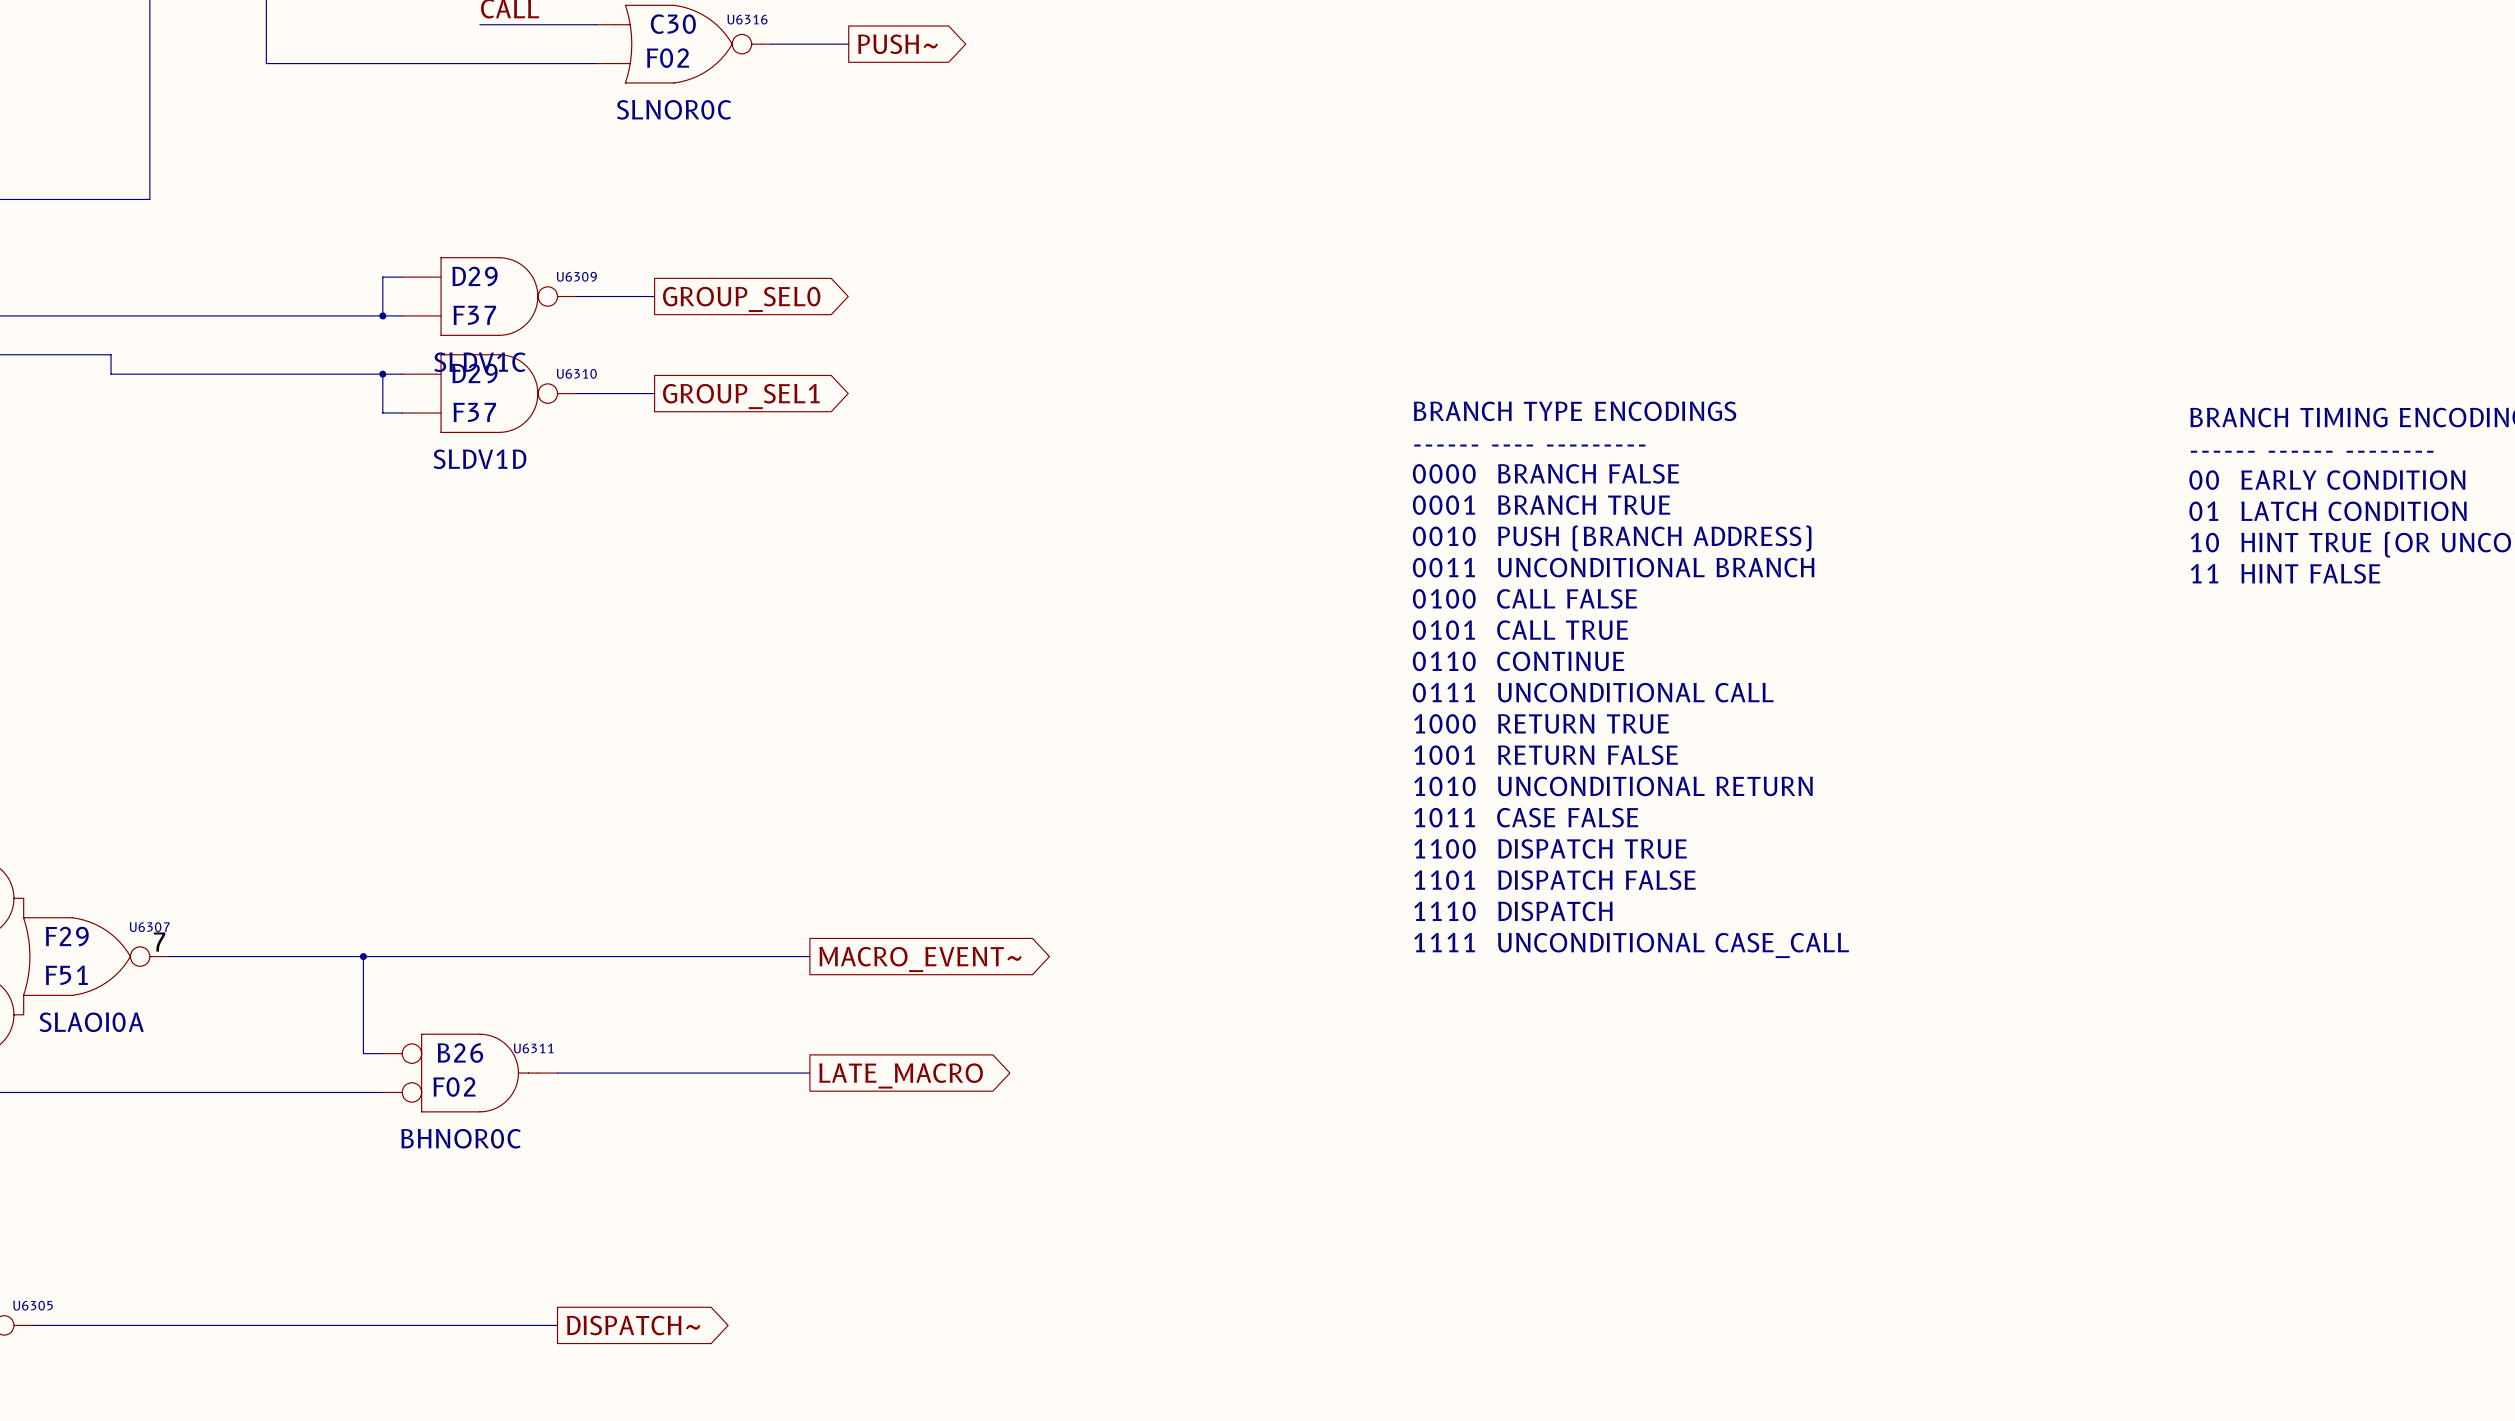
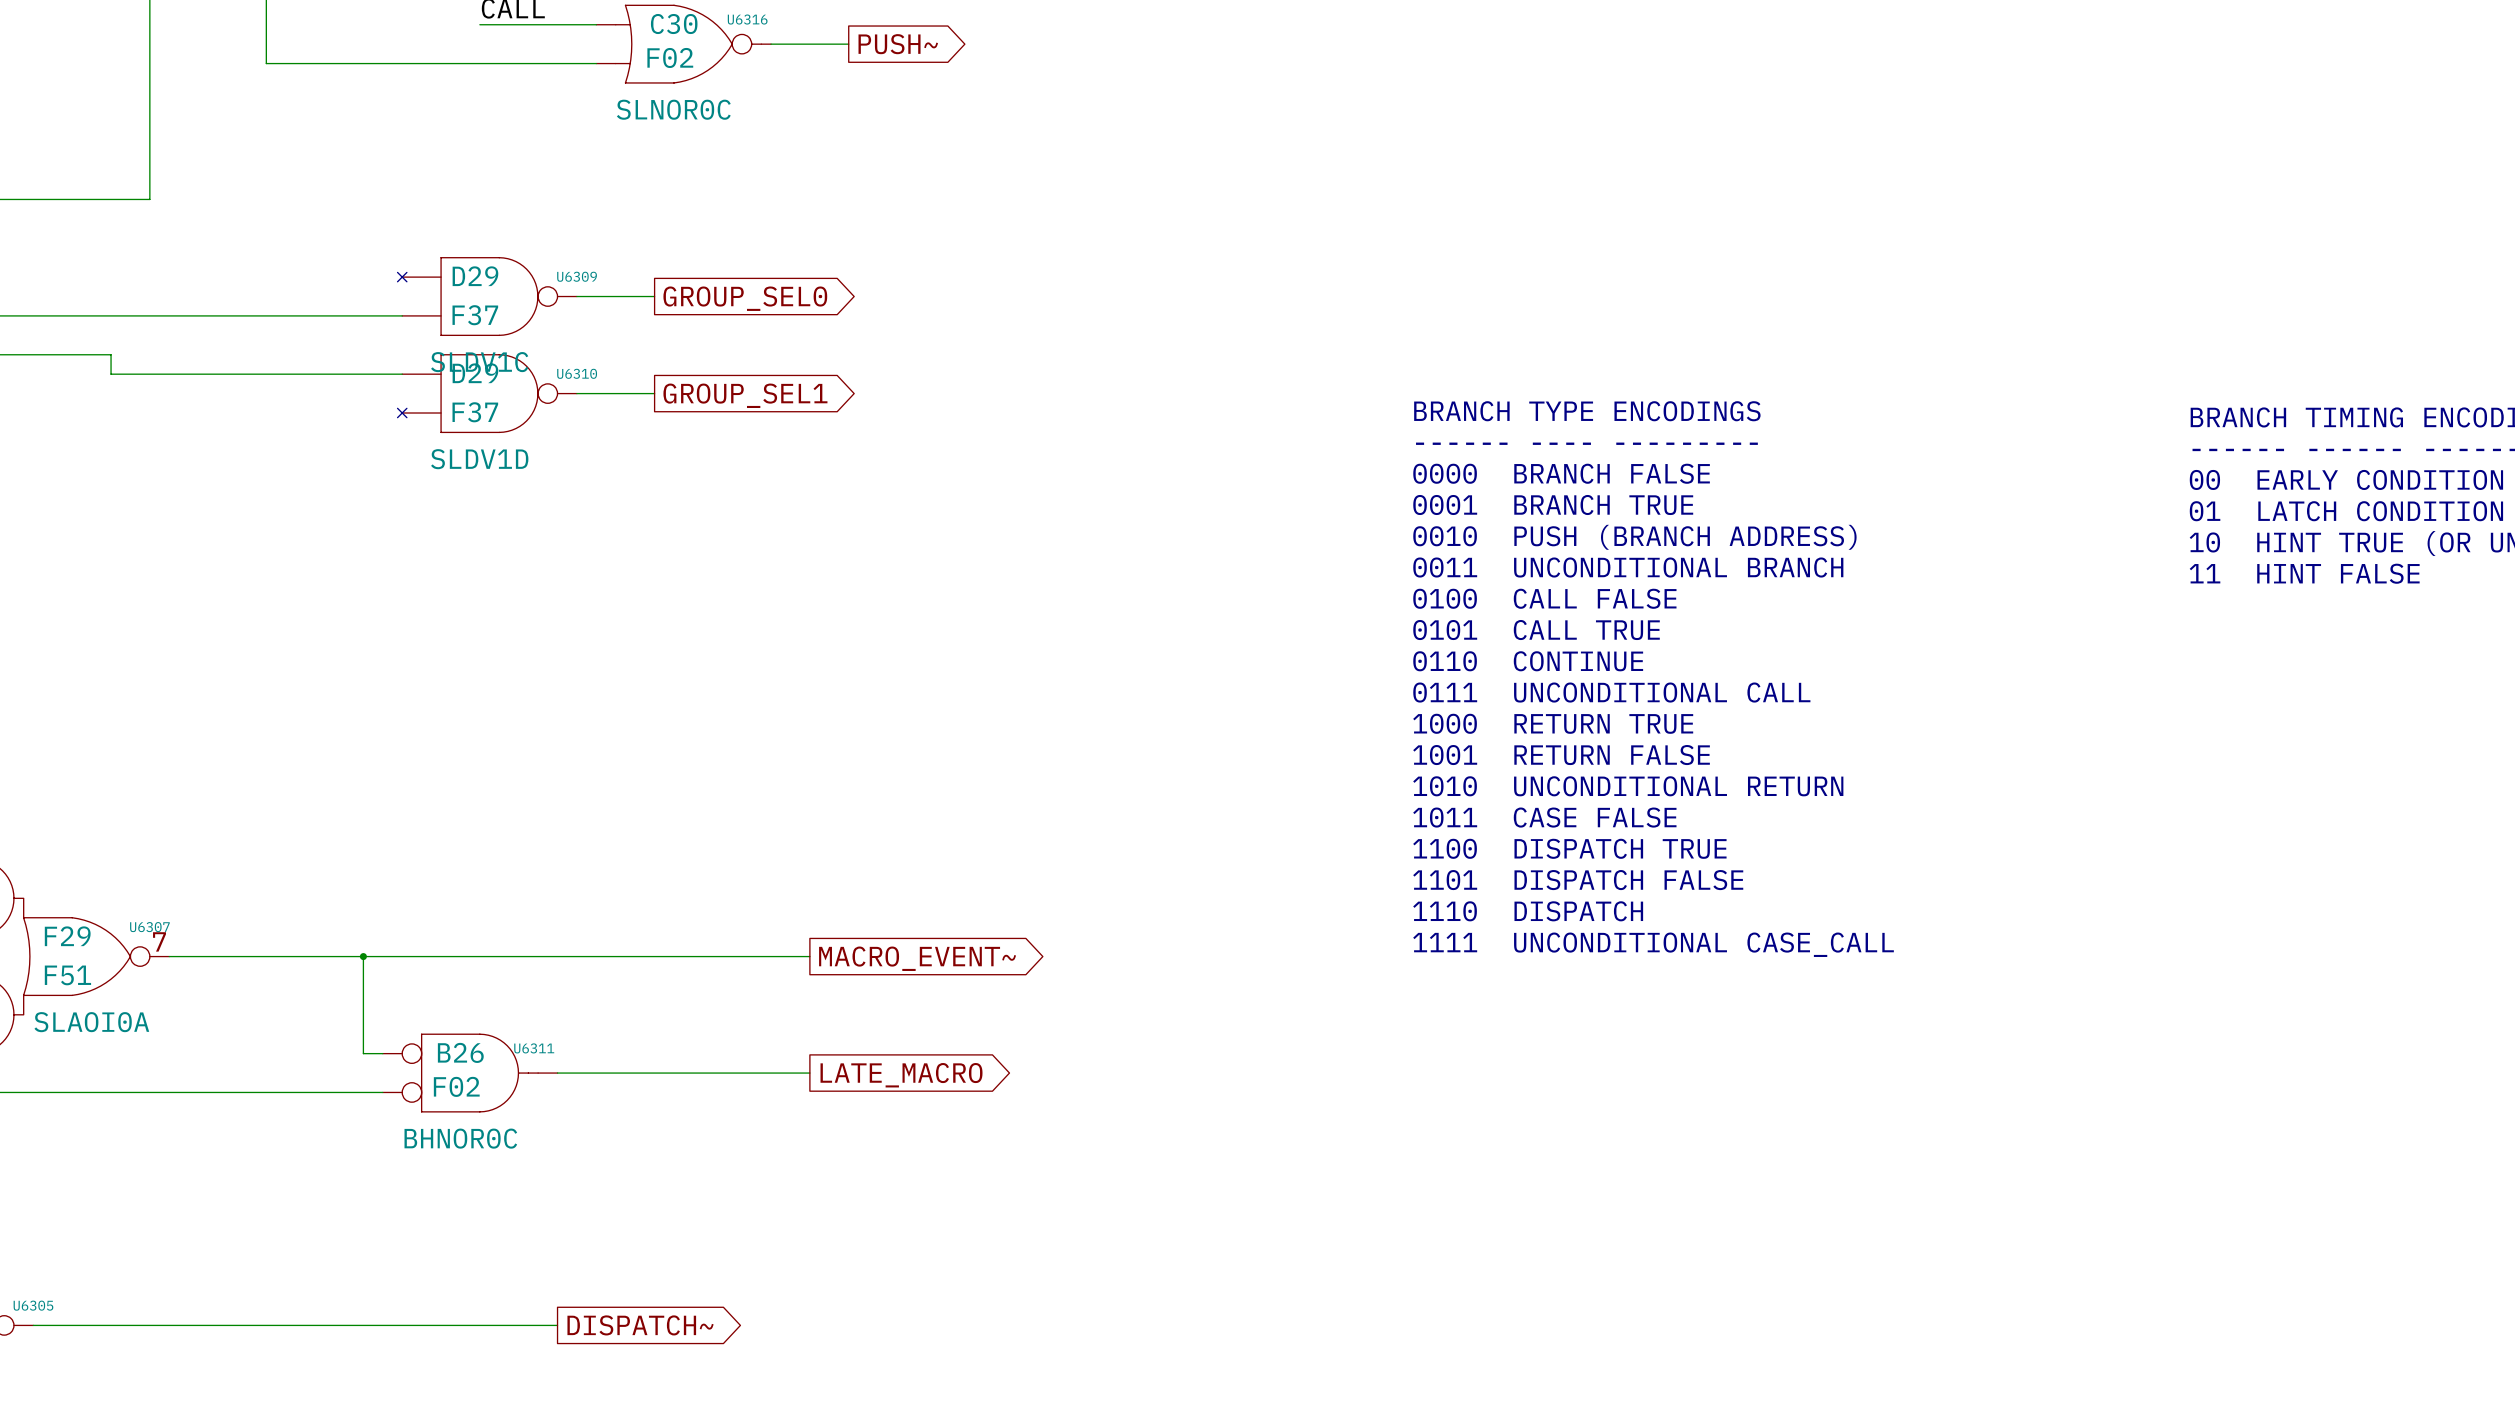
wire: (402, 277) (382, 277) (382, 315) -> none
no-connect mark: none -> (402, 277)
junction: (382, 315) -> none
wire: (382, 374) (382, 413) (402, 413) -> none
junction: (382, 374) -> none
no-connect mark: none -> (402, 413)

